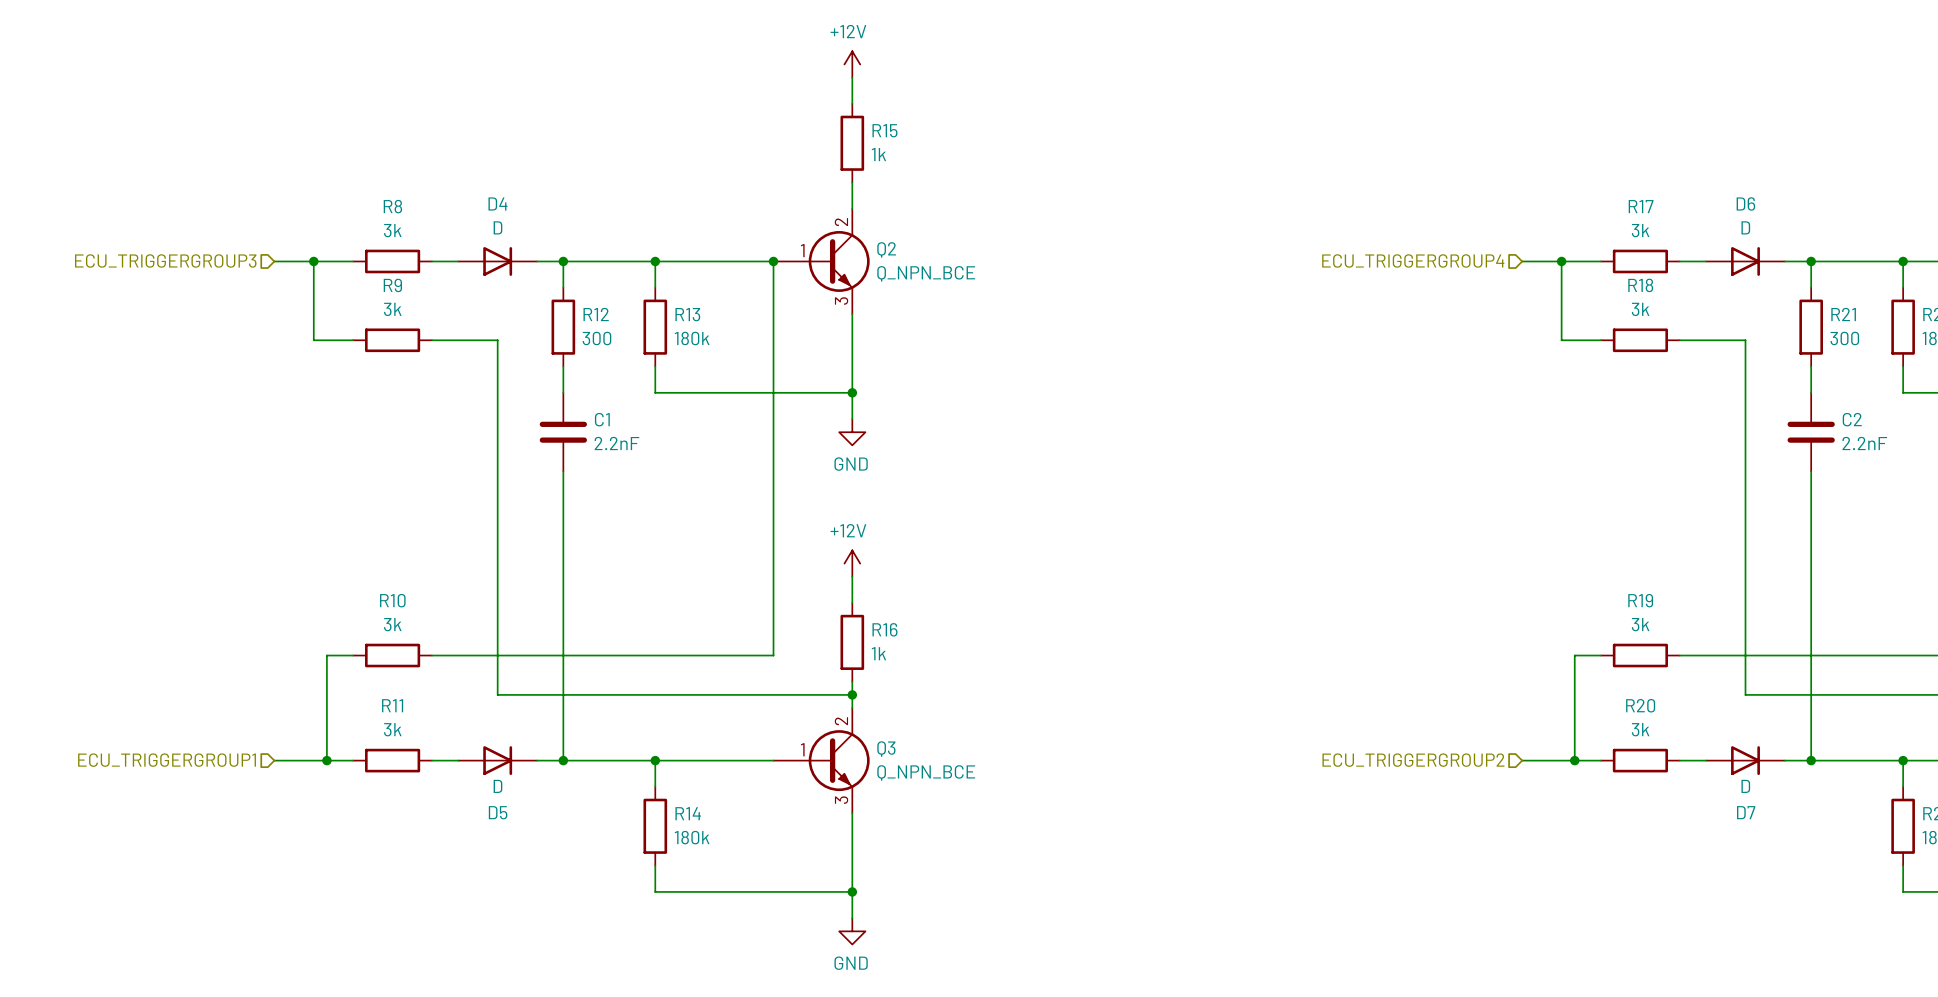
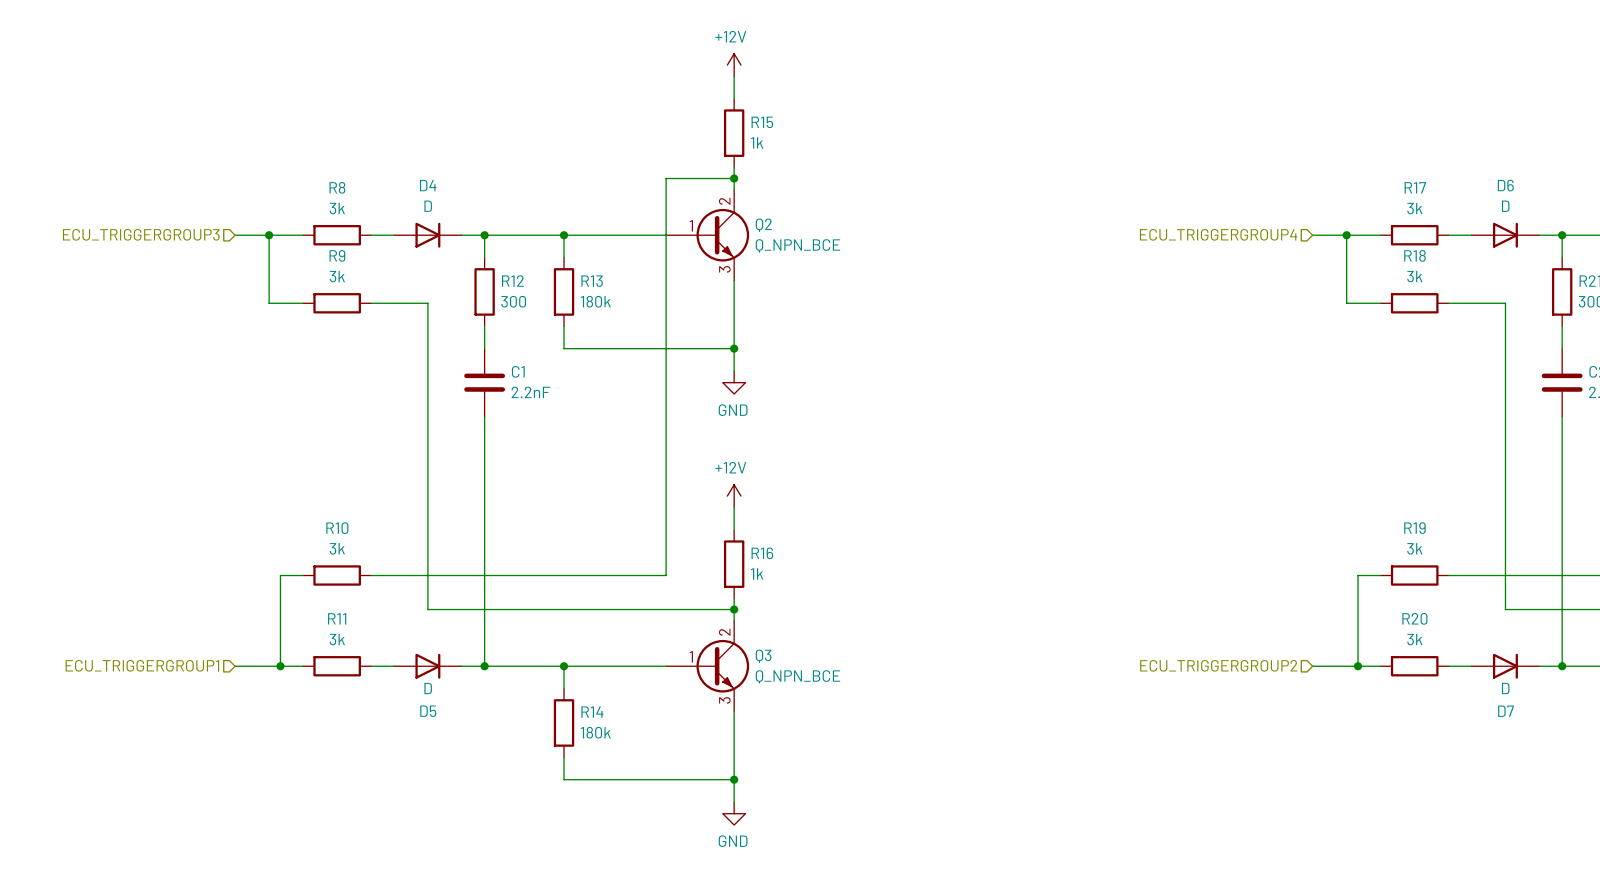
wire: none -> (734, 178) (666, 178) (666, 235)
junction: none -> (734, 178)
junction: (773, 261) -> none

